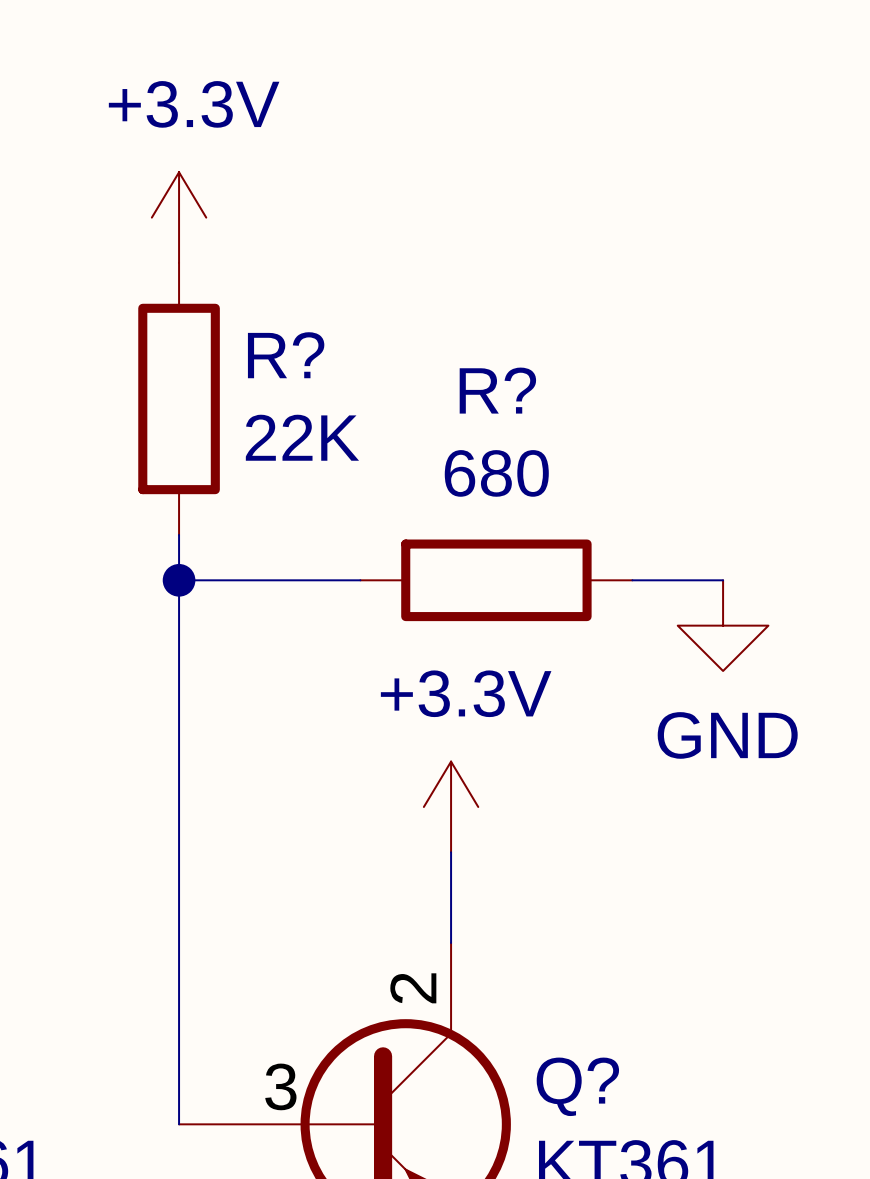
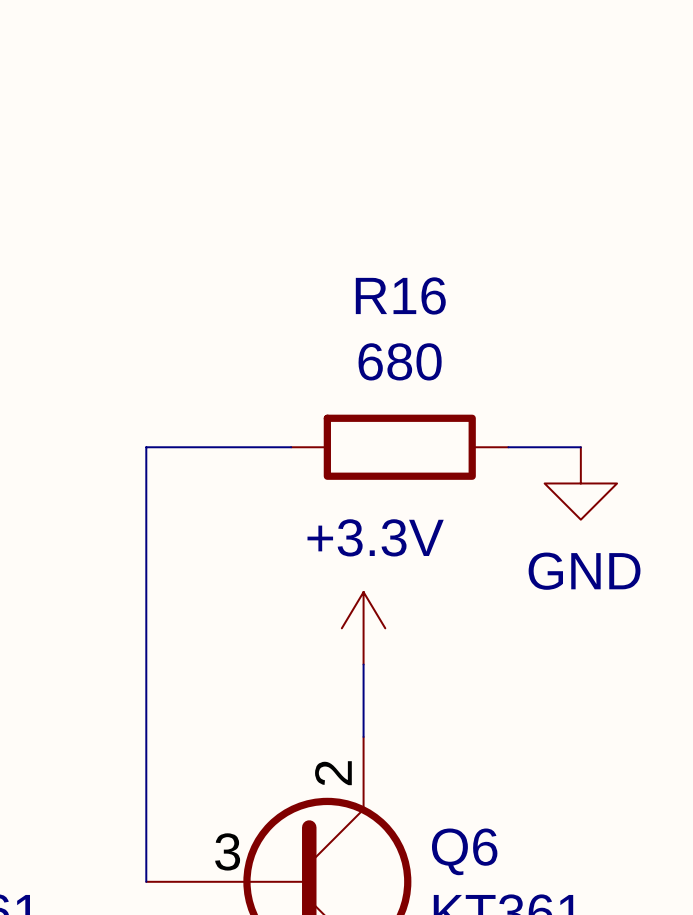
power symbol: +3.3V (179, 217) -> none
R? name: R? (497, 390) -> R16 (400, 295)
R?: 22K (179, 398) -> none
wire: (179, 534) (179, 580) -> none
junction: (179, 580) -> none
Q? name: Q? (577, 1086) -> Q6 (464, 851)

